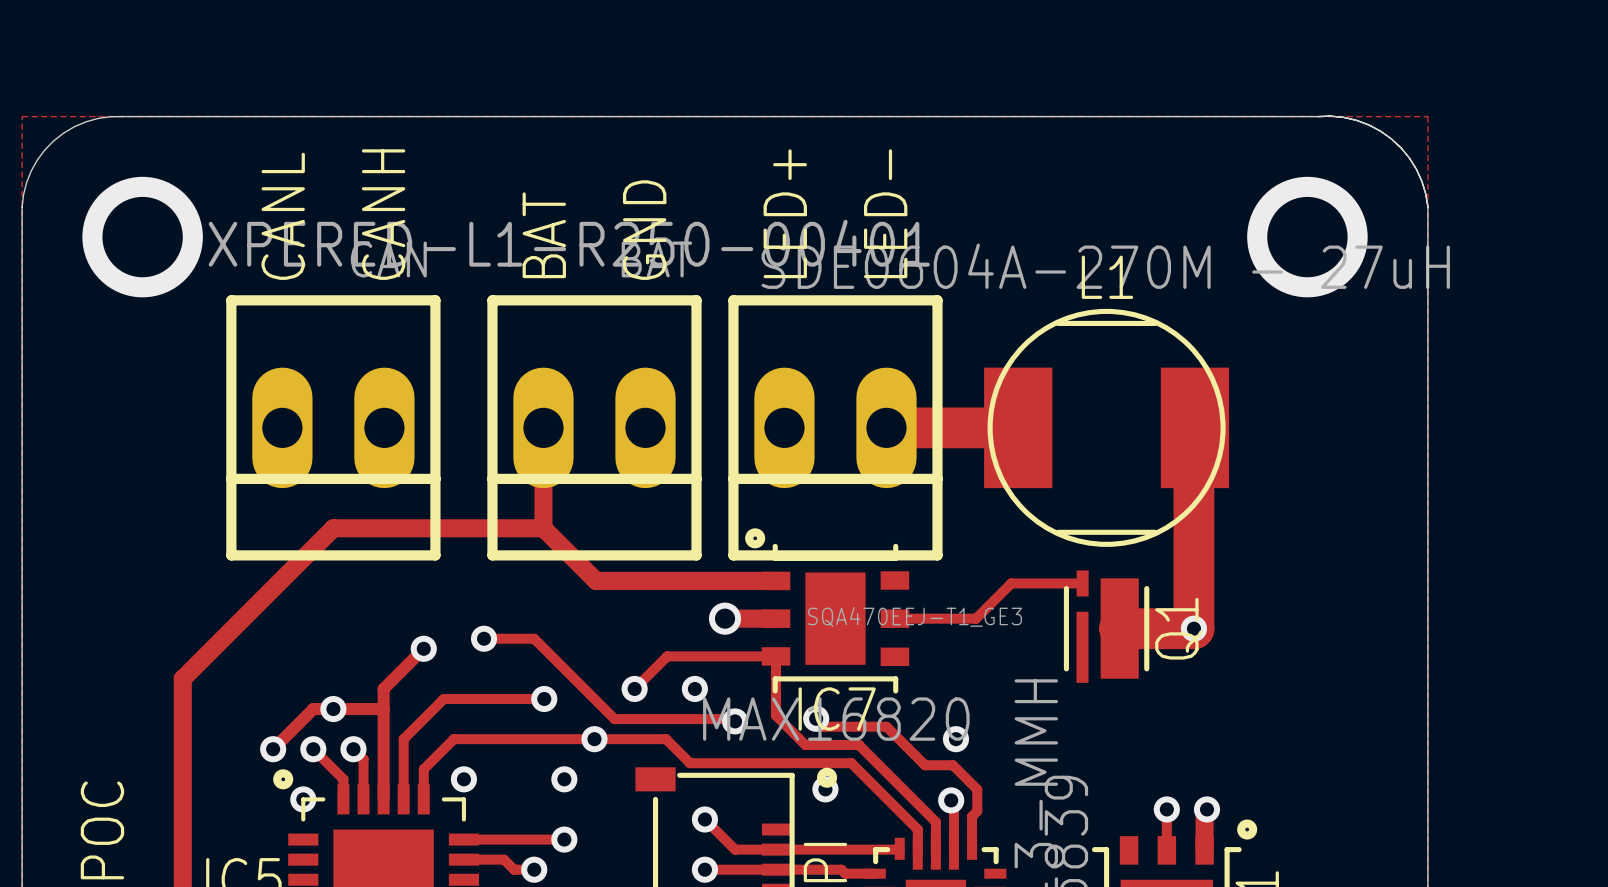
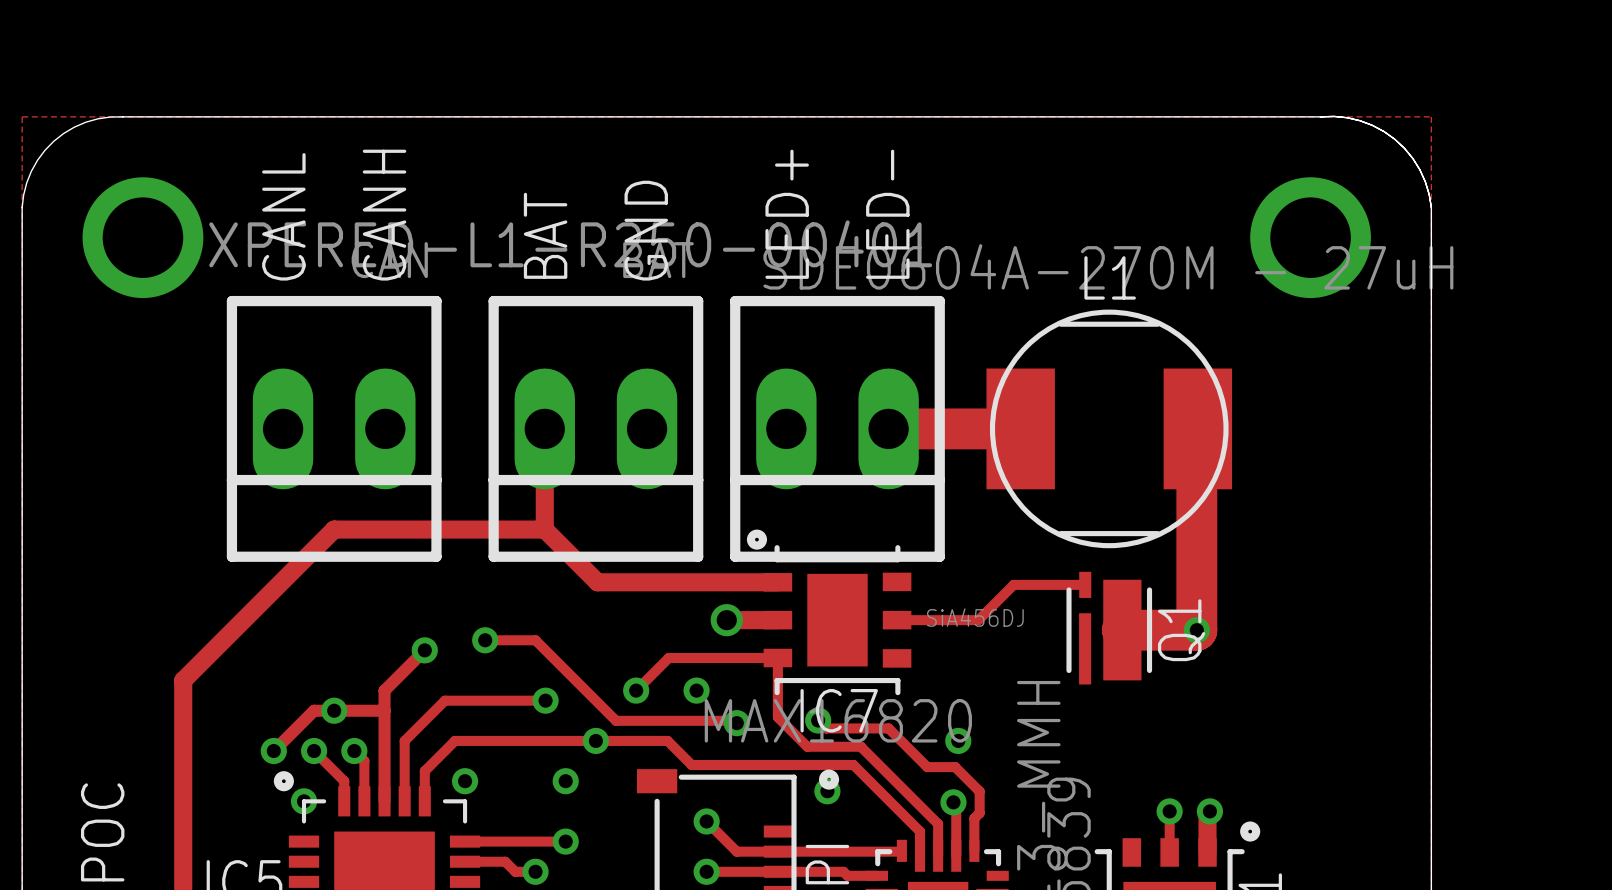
Q1 value: SQA470EEJ-T1_GE3 (914, 616) -> SiA456DJ (975, 617)

